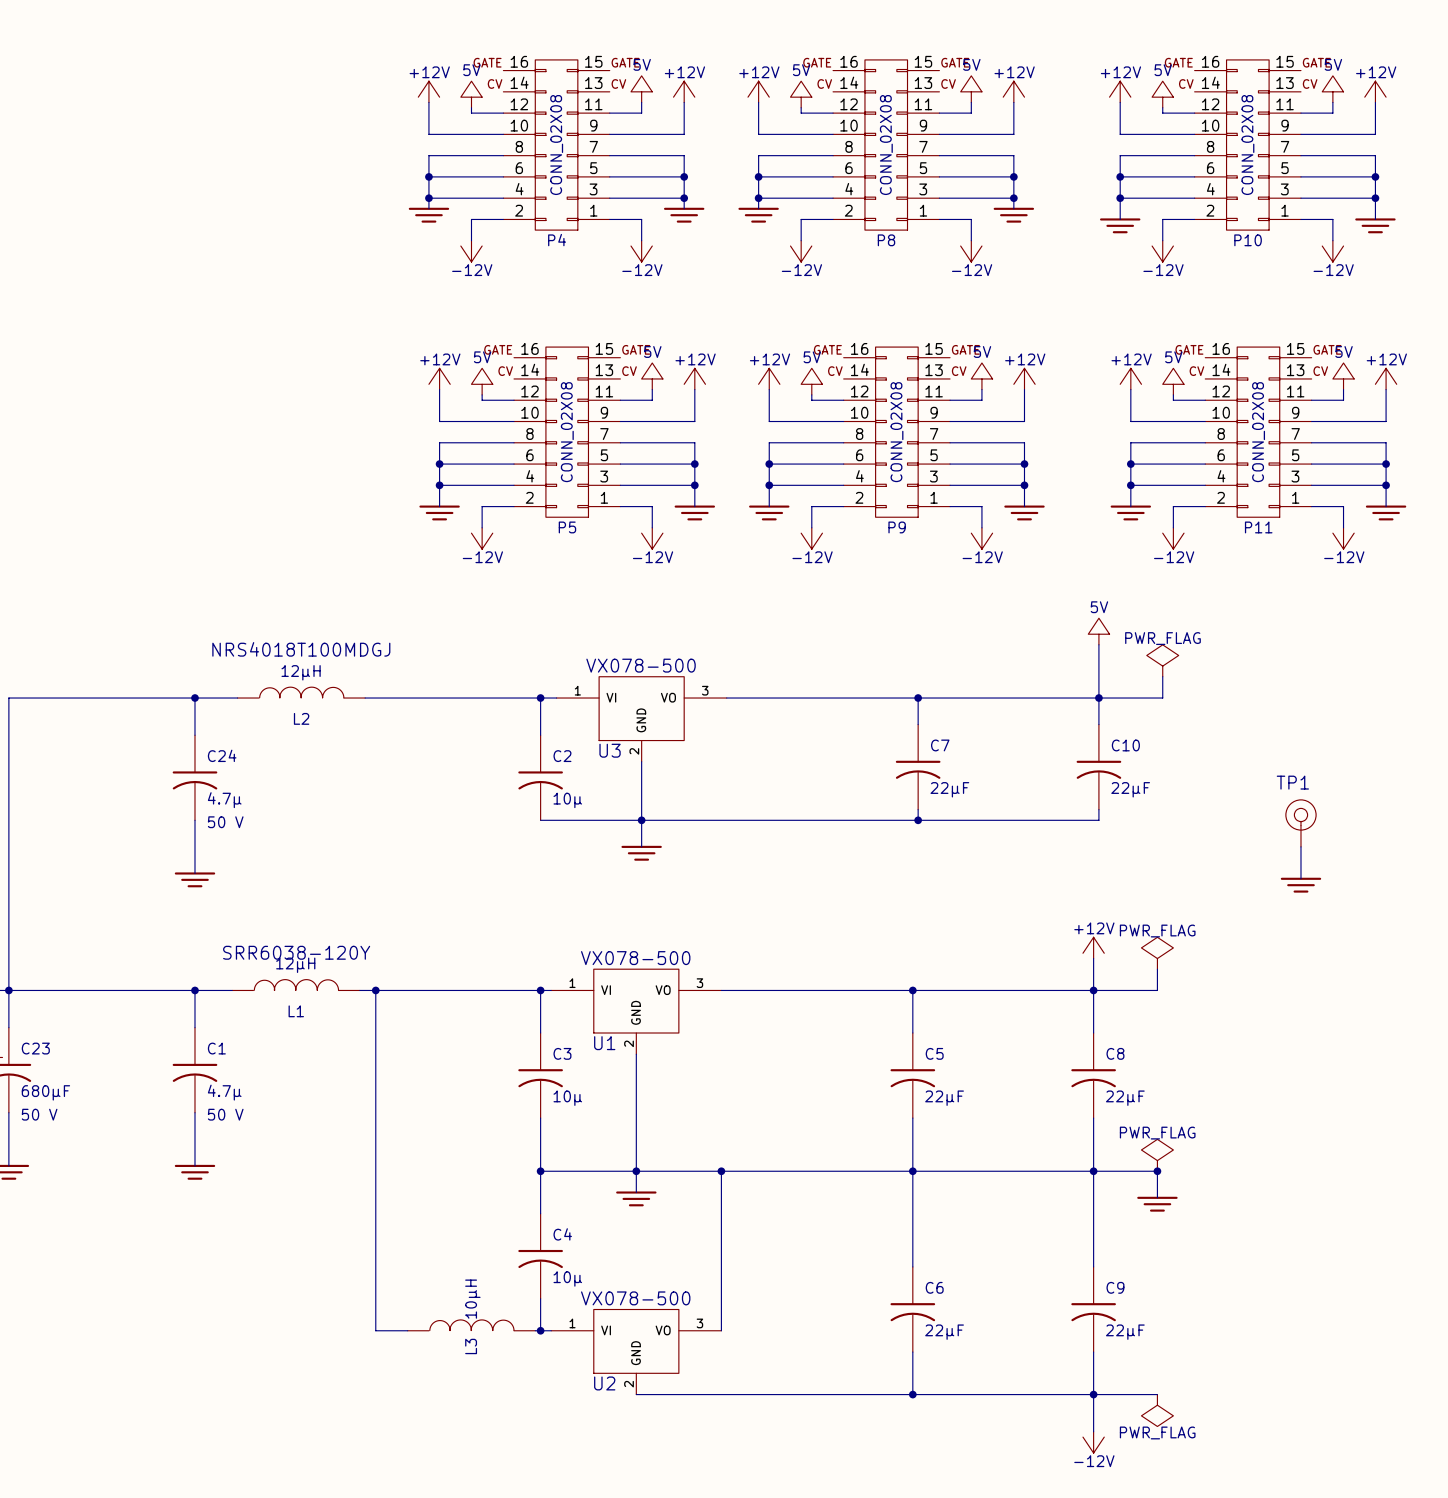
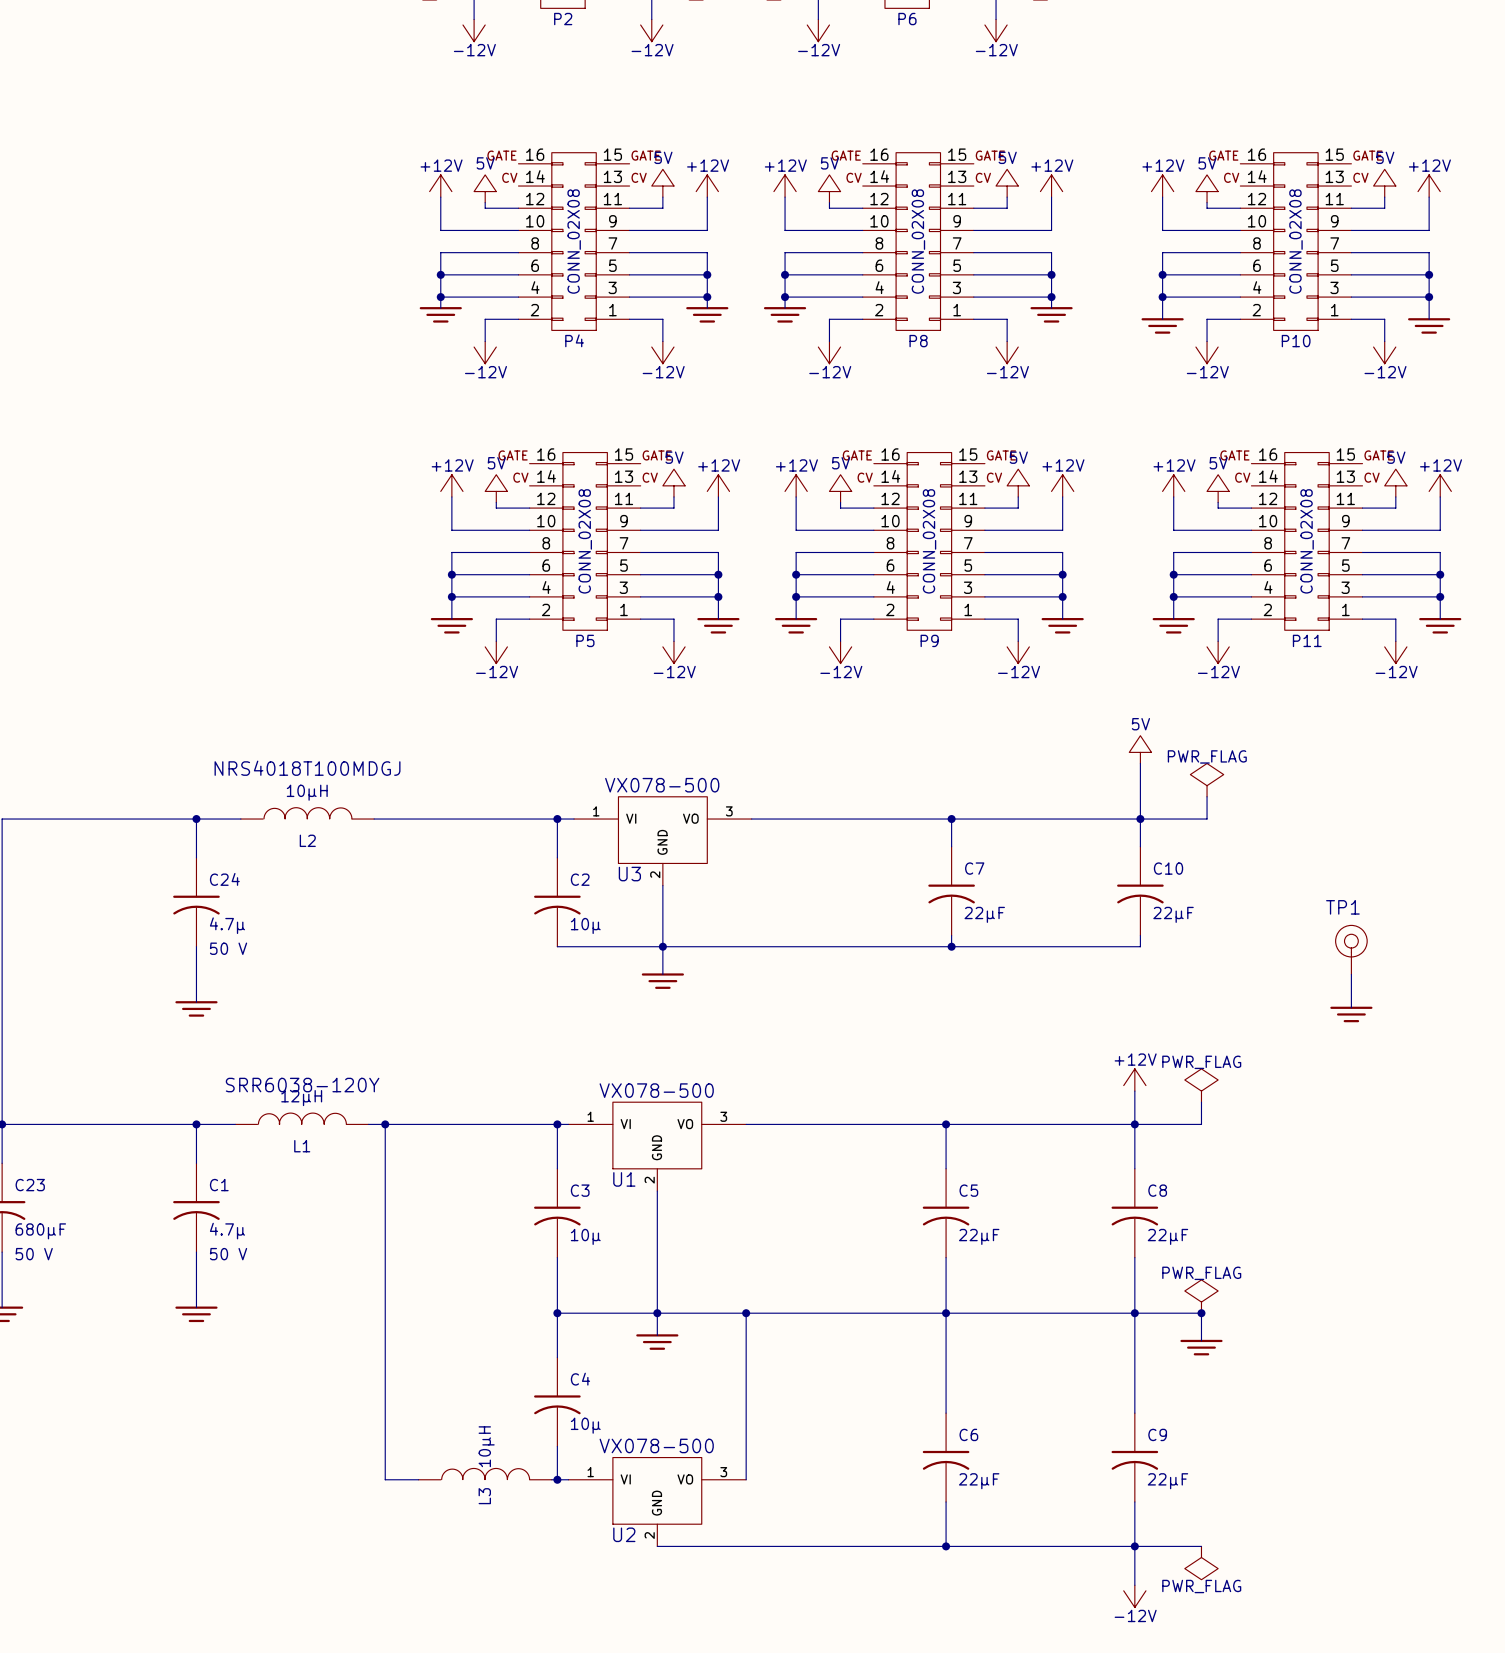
L2 value: 12µH (301, 672) -> 10µH (307, 792)

